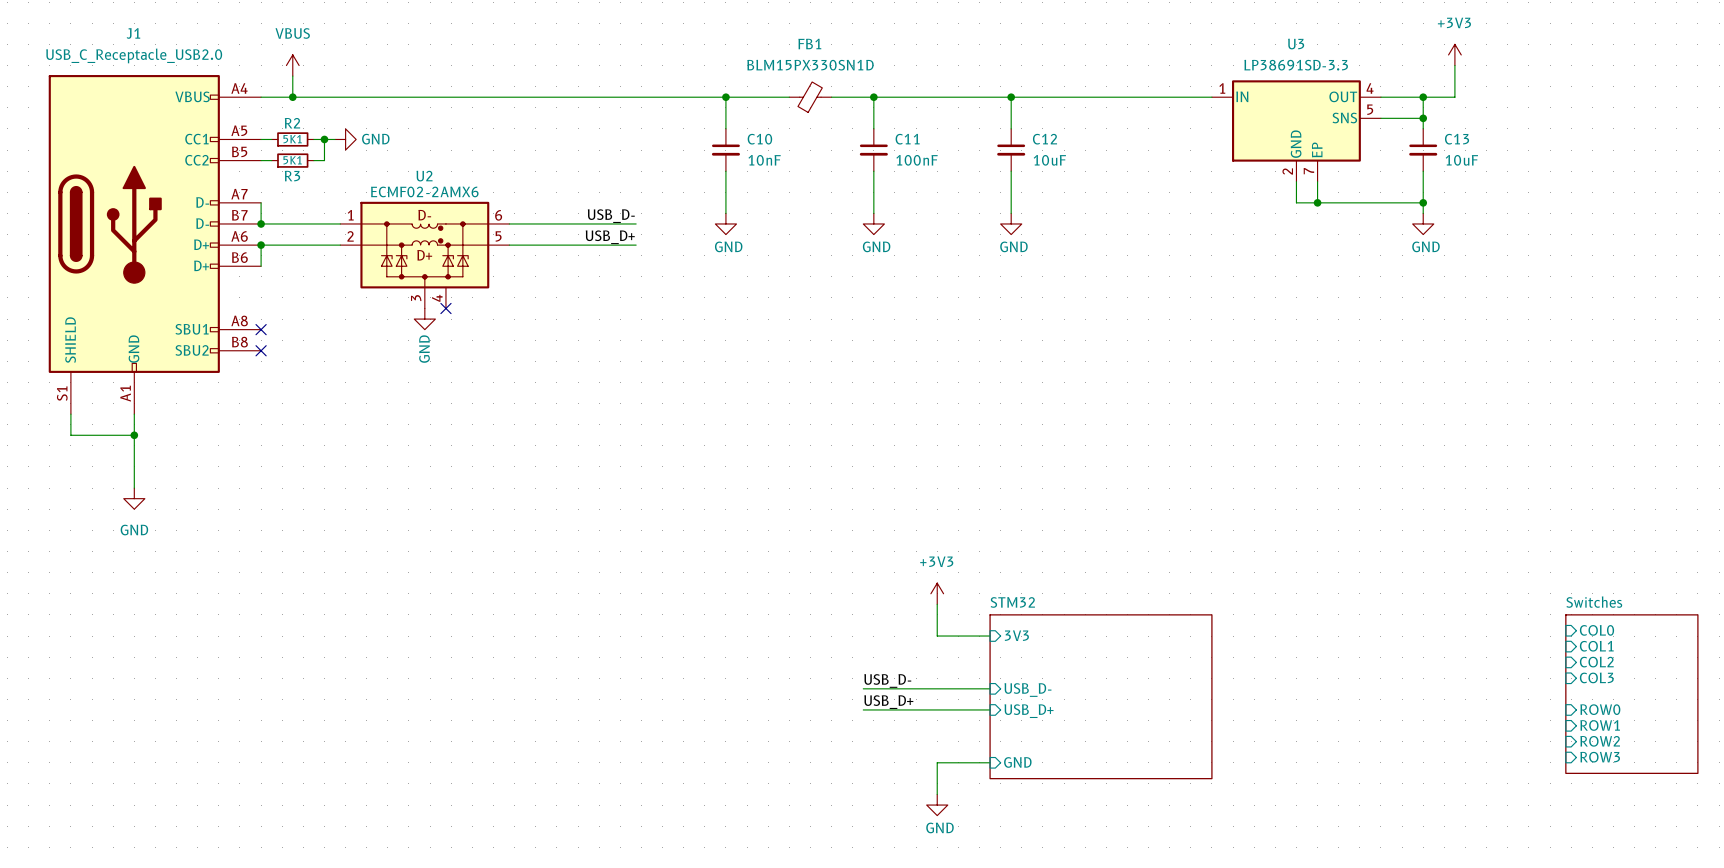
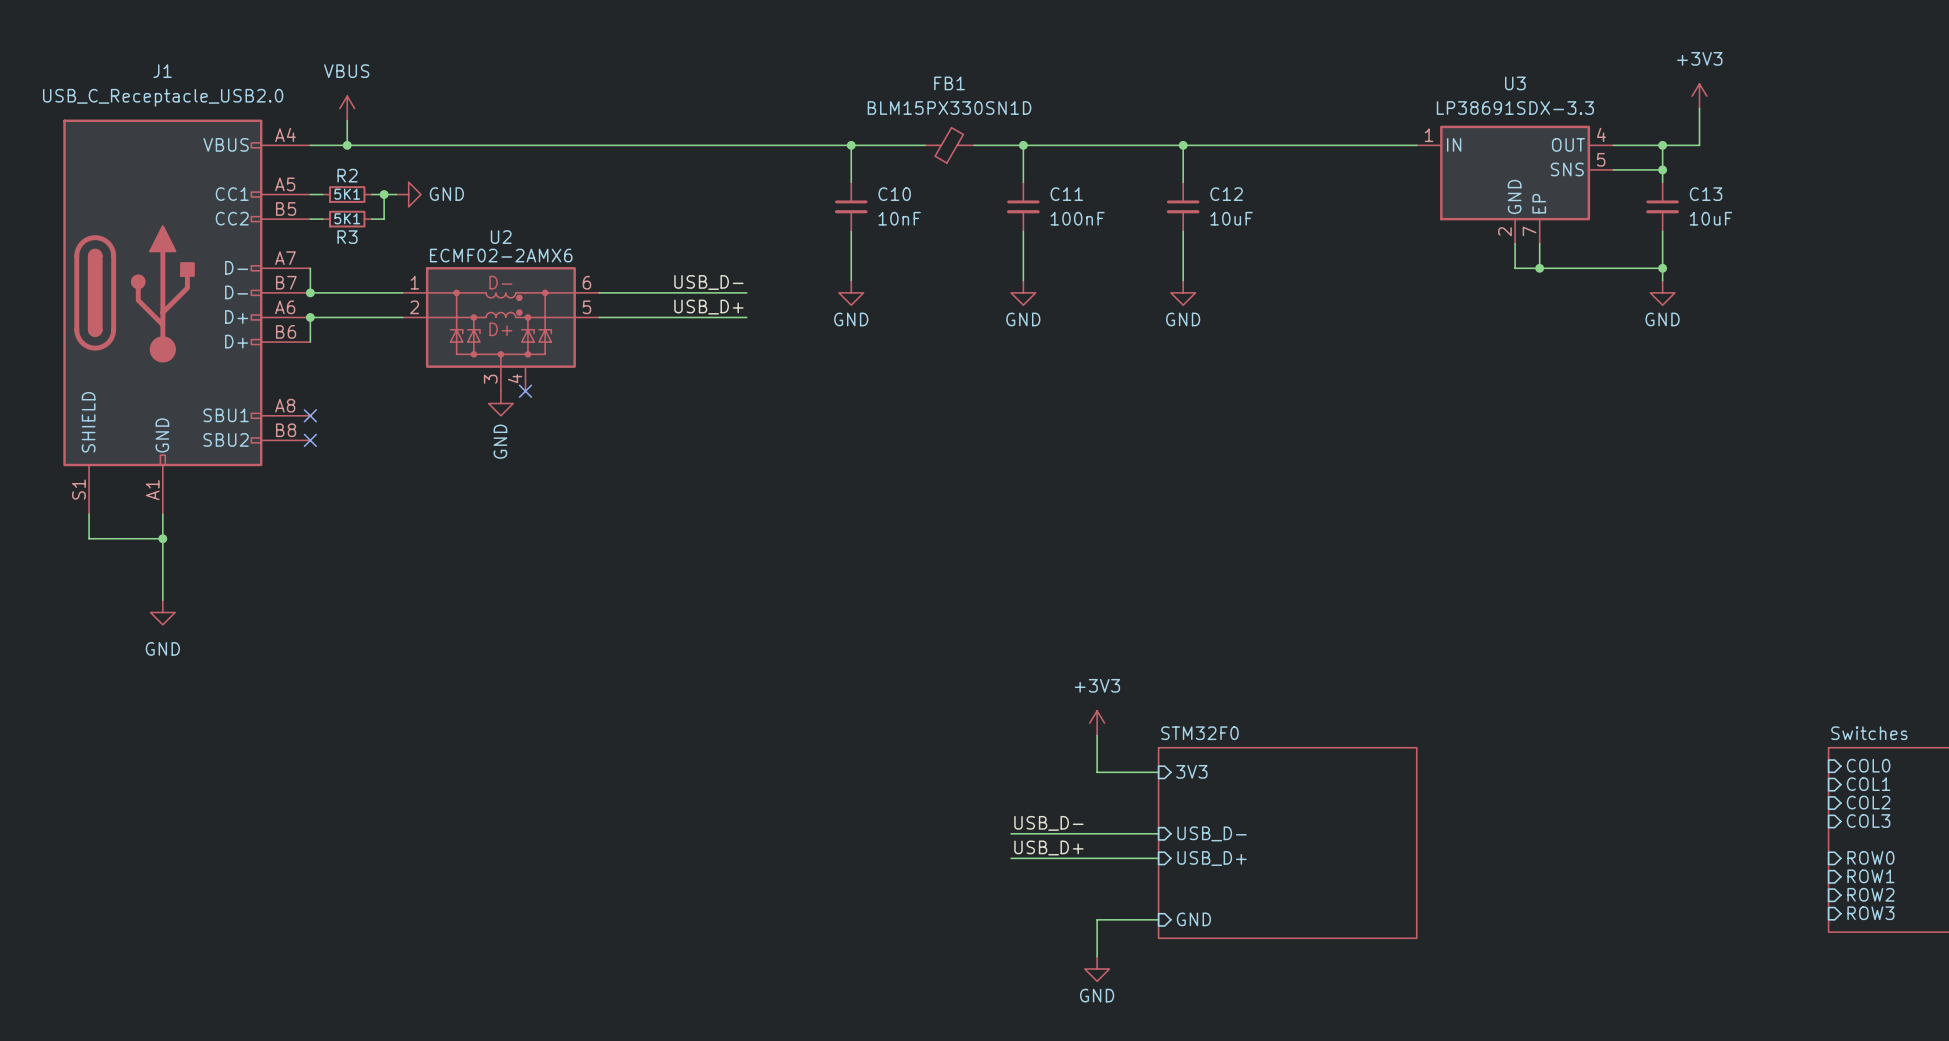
U3 value: LP38691SD-3.3 (1296, 65) -> LP38691SDX-3.3 (1515, 108)
sheet STM32 name: STM32 (1012, 602) -> STM32F0 (1199, 733)

